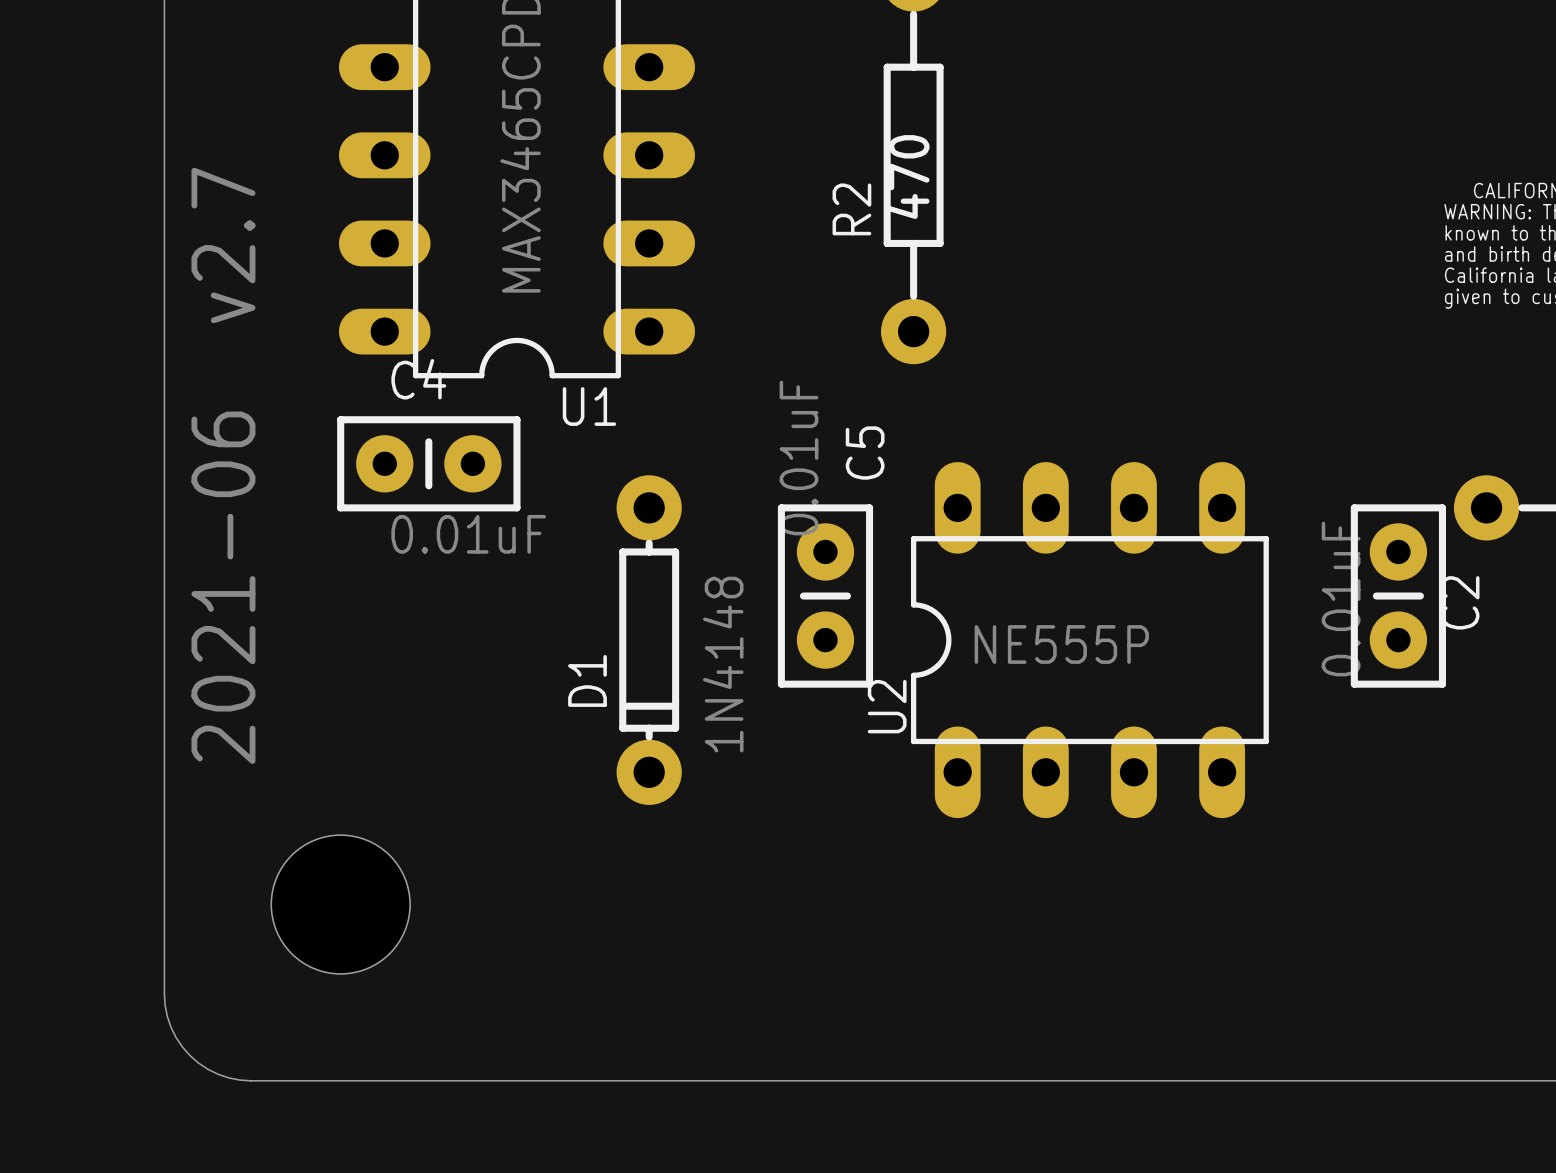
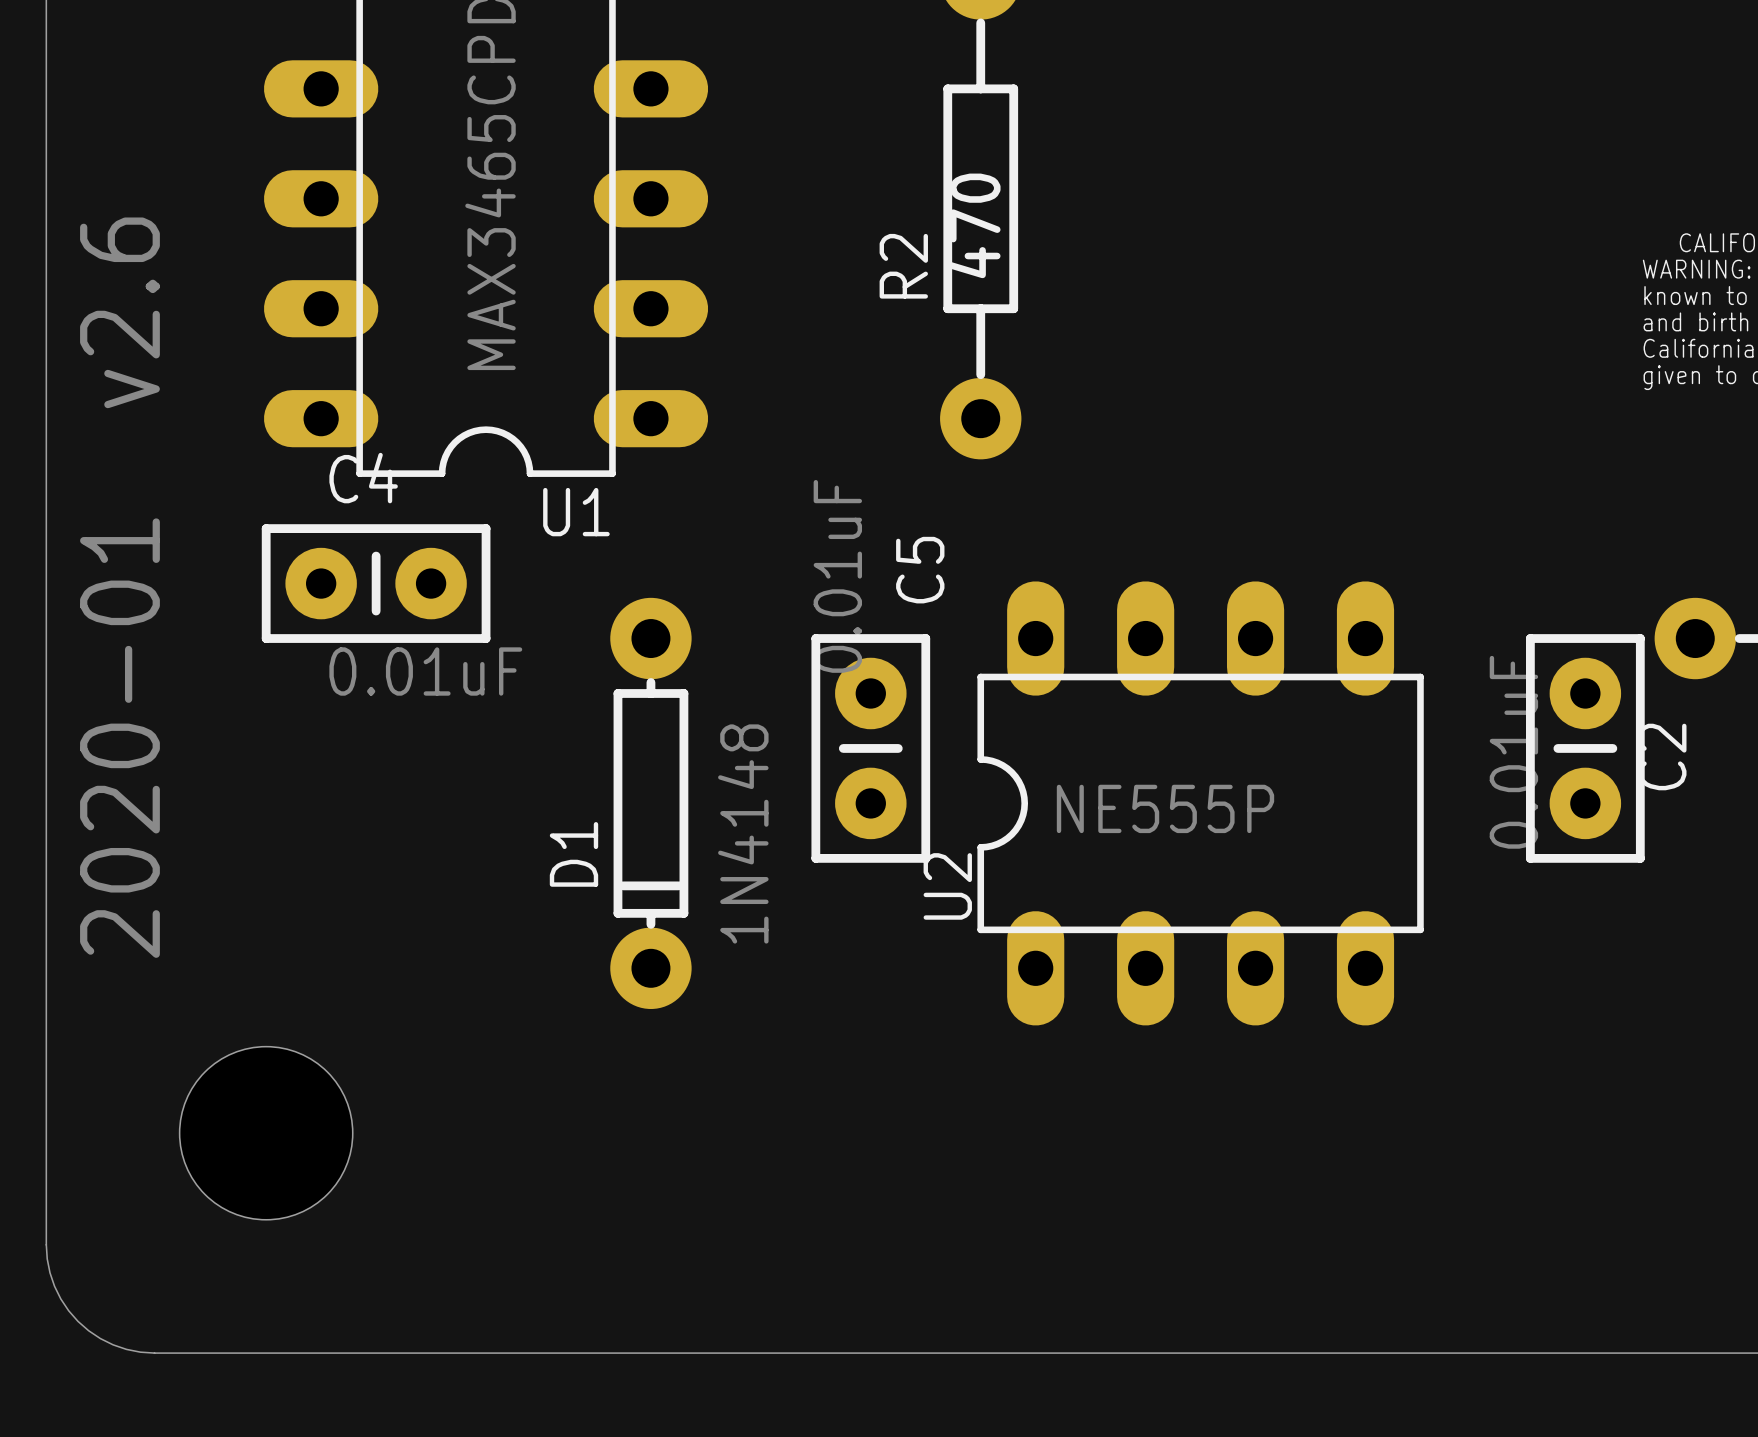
text: v2.7 (223, 245) -> v2.6 (119, 312)
text: 2021-06 (223, 587) -> 2020-01 (119, 738)

